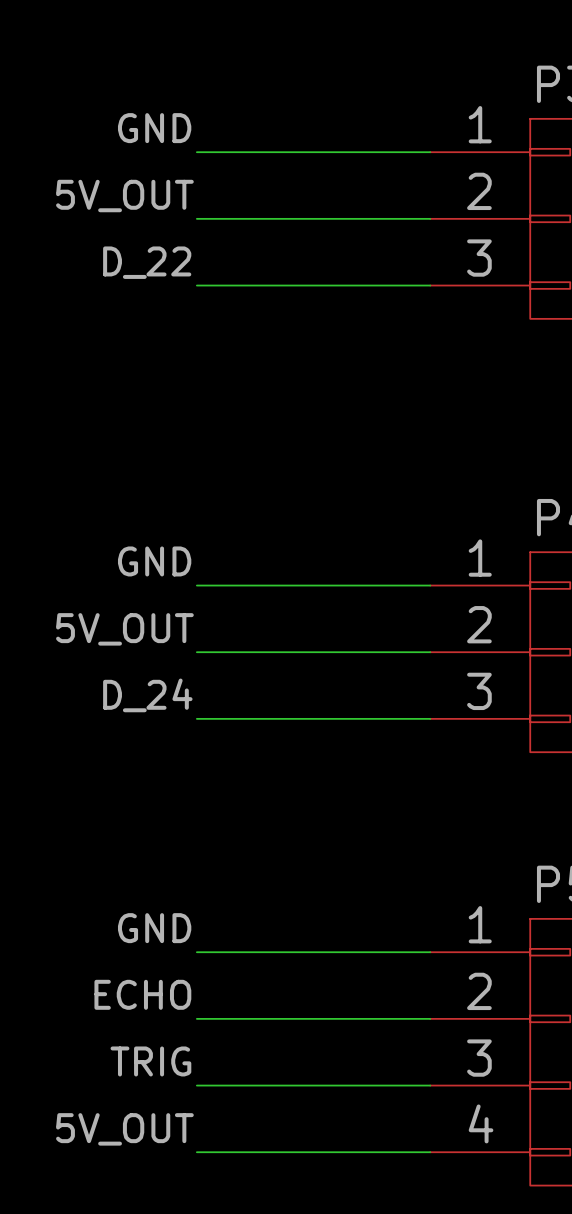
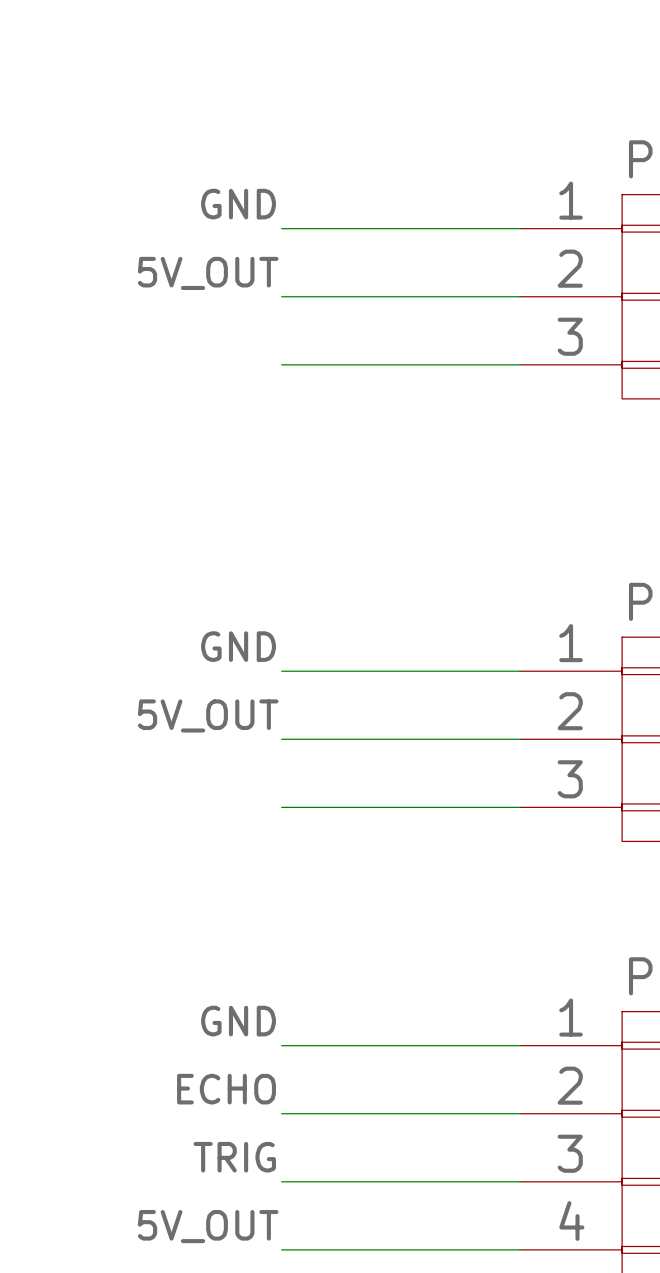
label: D_22 (147, 262) -> none
label: D_24 (147, 695) -> none

